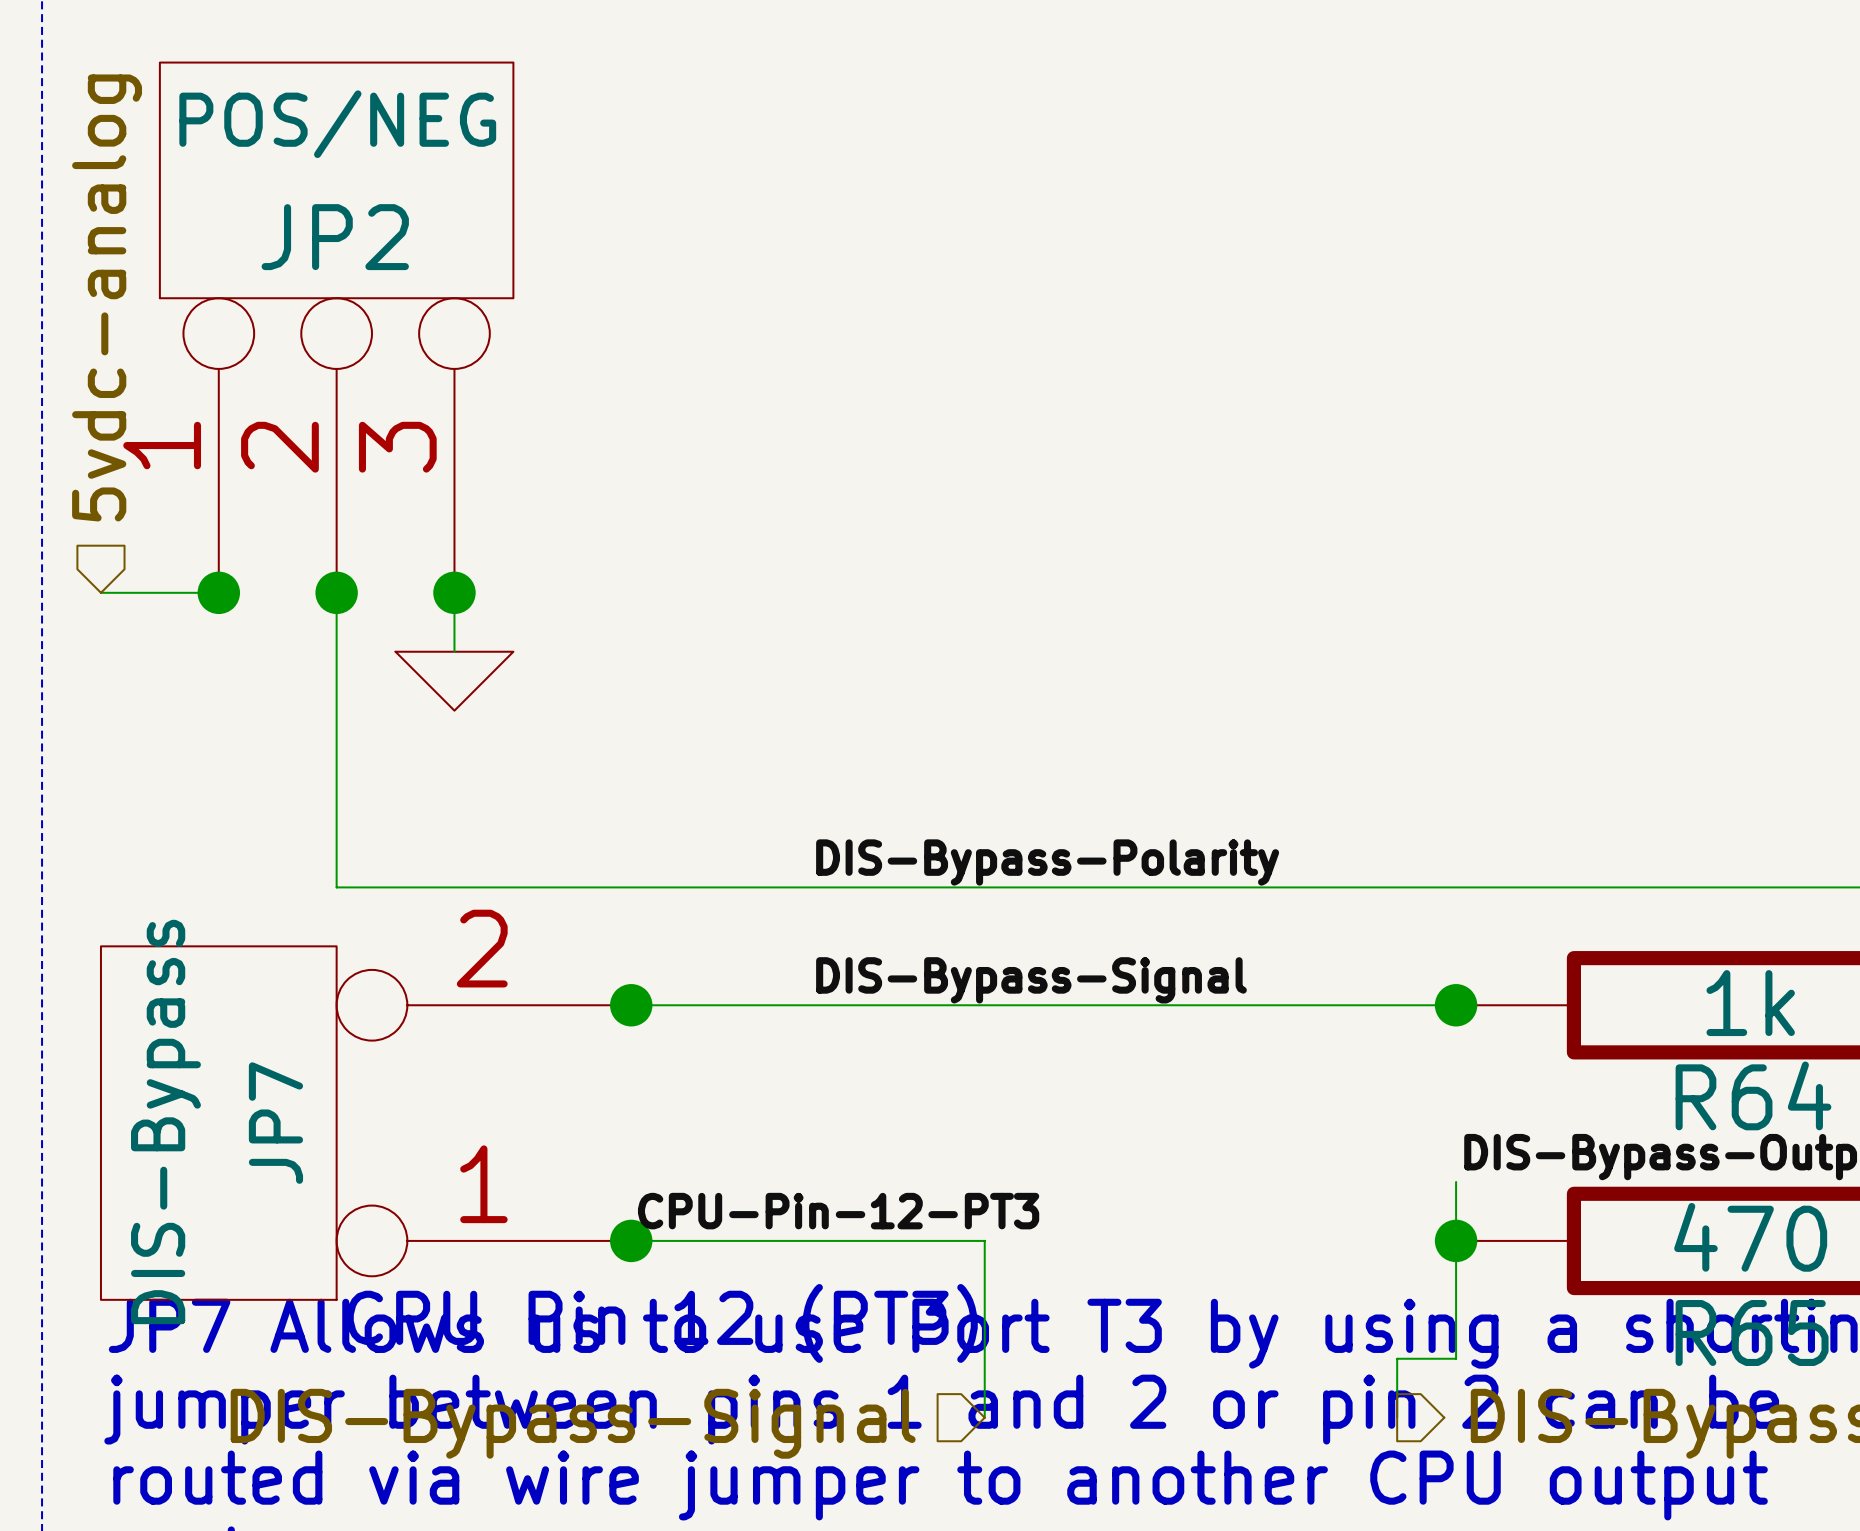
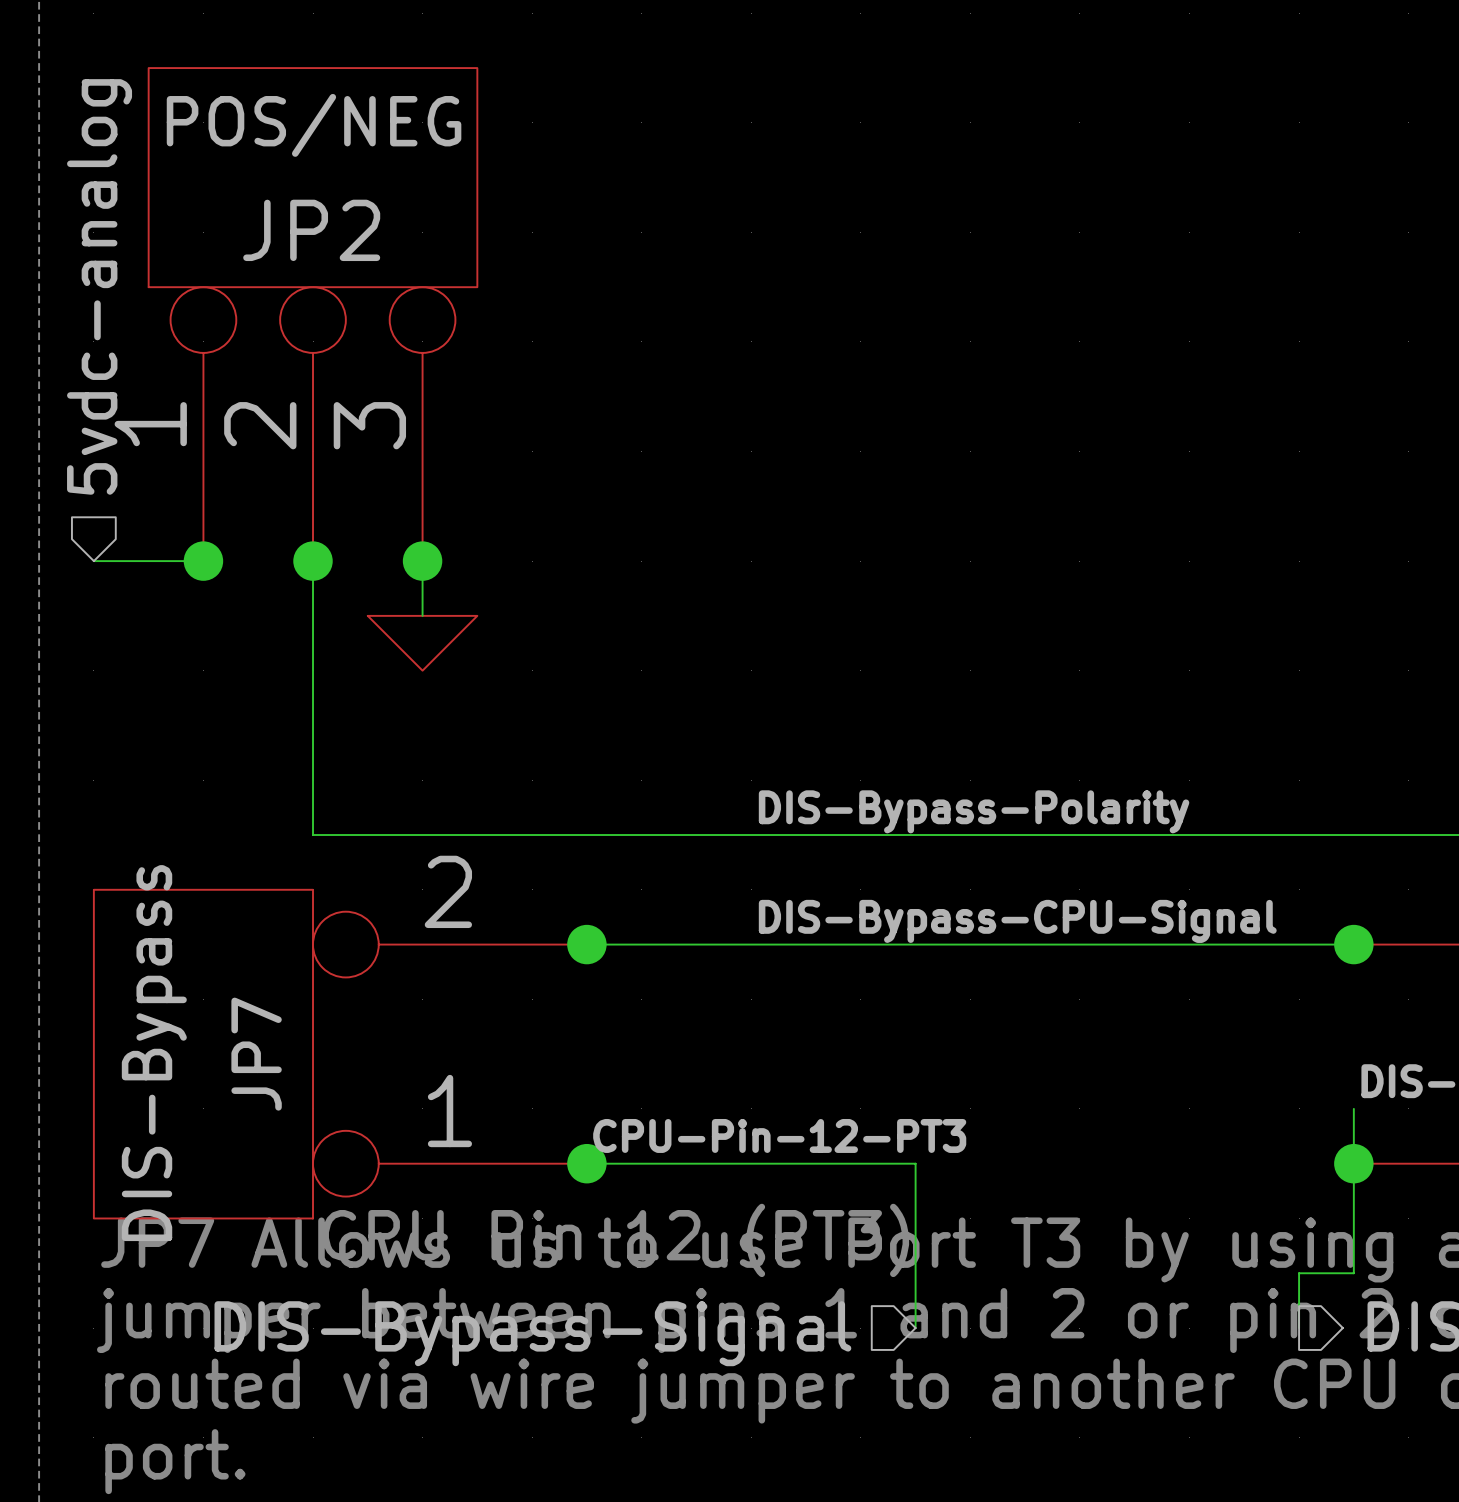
label: DIS-Bypass-Signal (1031, 980) -> DIS-Bypass-CPU-Signal (1017, 921)

